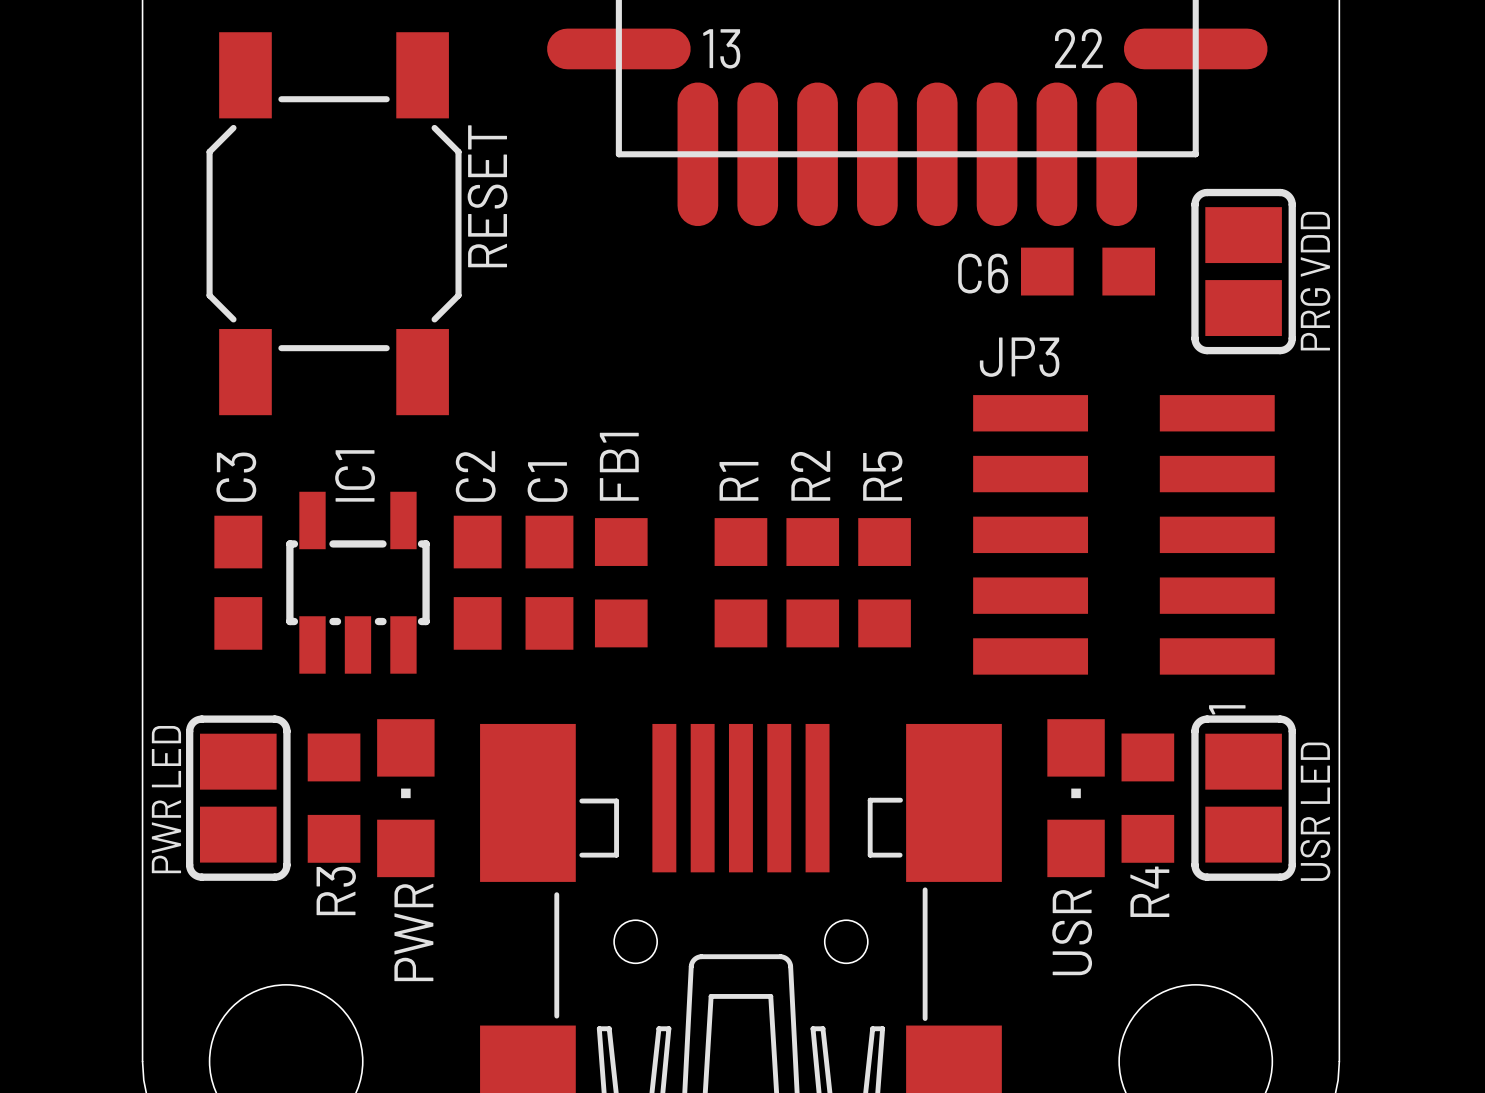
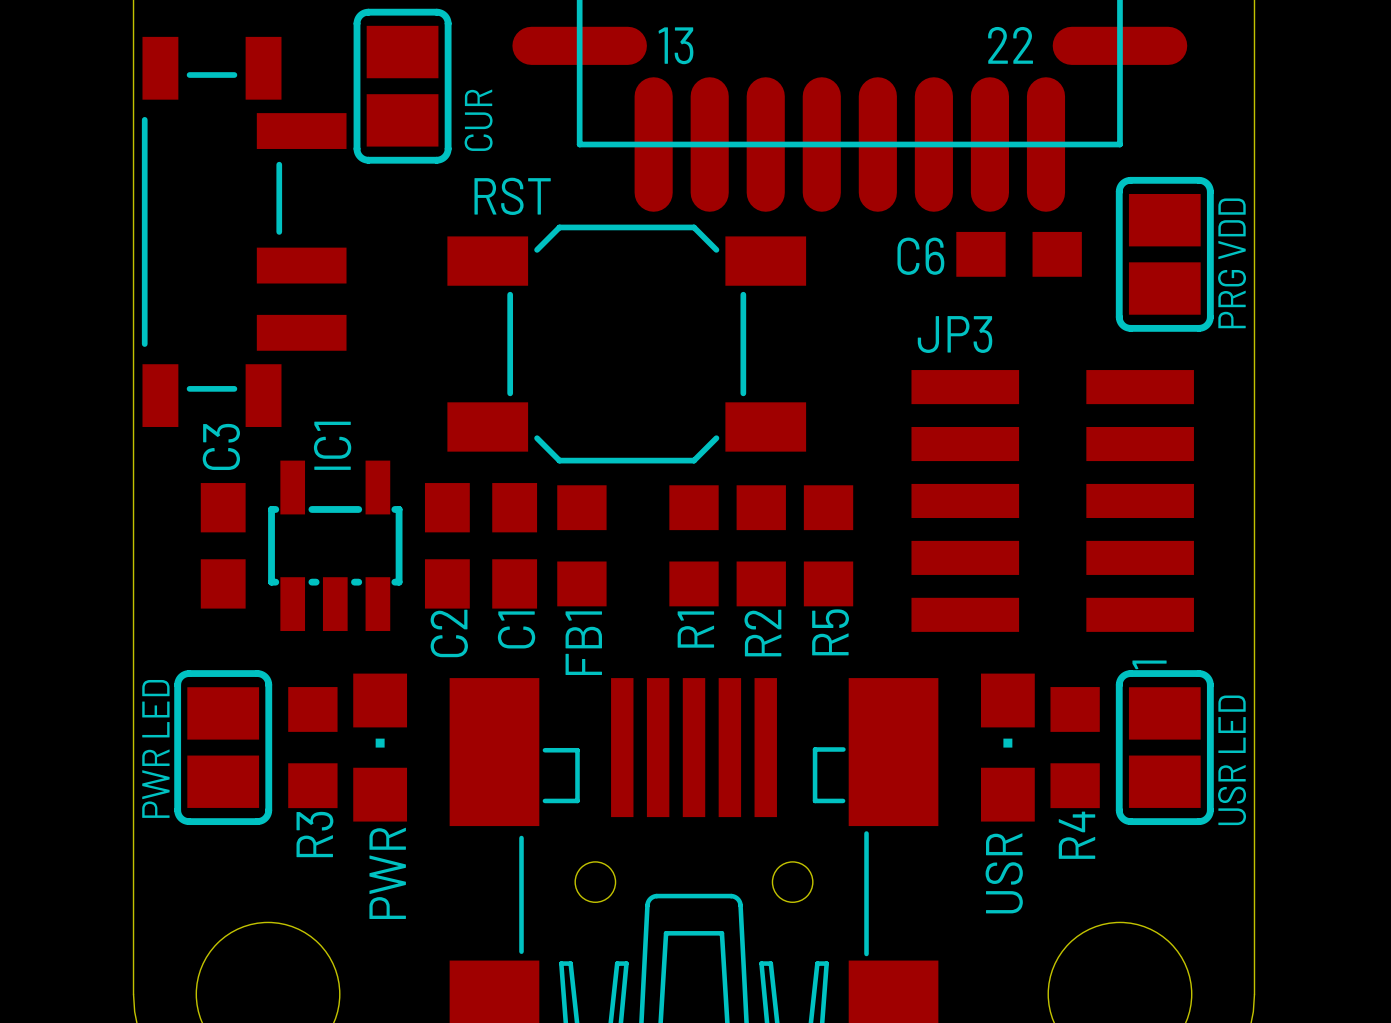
part: none -> (402, 86)
text: none -> CUR (478, 120)
RESET: (334, 223) -> none
part: none -> (244, 231)
RST: none -> (626, 344)
FB1 name position: FB1 (619, 466) -> FB1 (583, 643)
R2 name position: R2 (810, 475) -> R2 (762, 633)
C2 name position: C2 (475, 476) -> C2 (449, 633)
R5 name position: R5 (882, 476) -> R5 (830, 632)
R1 name position: R1 (738, 481) -> R1 (695, 629)
C1 name position: C1 (547, 482) -> C1 (516, 629)

